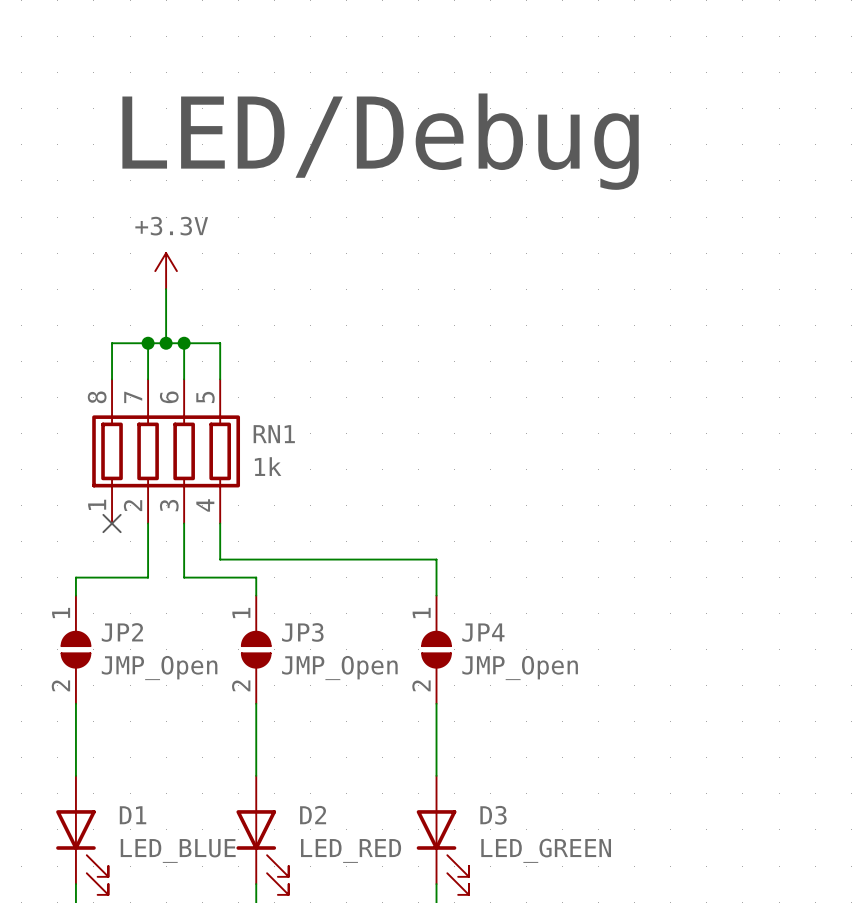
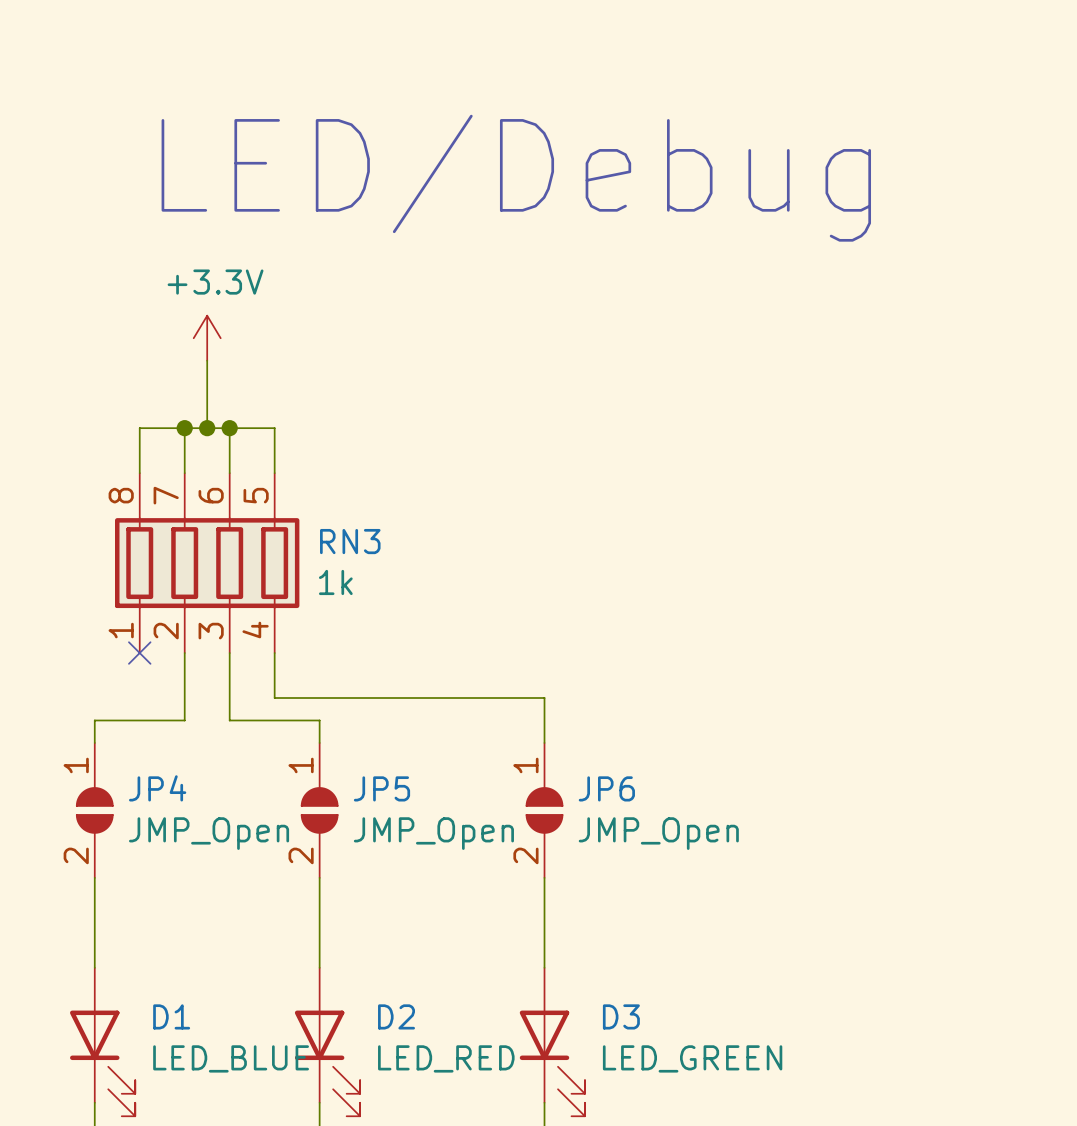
RN1 name: RN1 (274, 434) -> RN3 (350, 541)
JP2 name: JP2 (122, 632) -> JP4 (157, 788)
JP3 name: JP3 (302, 632) -> JP5 (381, 788)
JP4 name: JP4 (483, 632) -> JP6 (606, 788)

